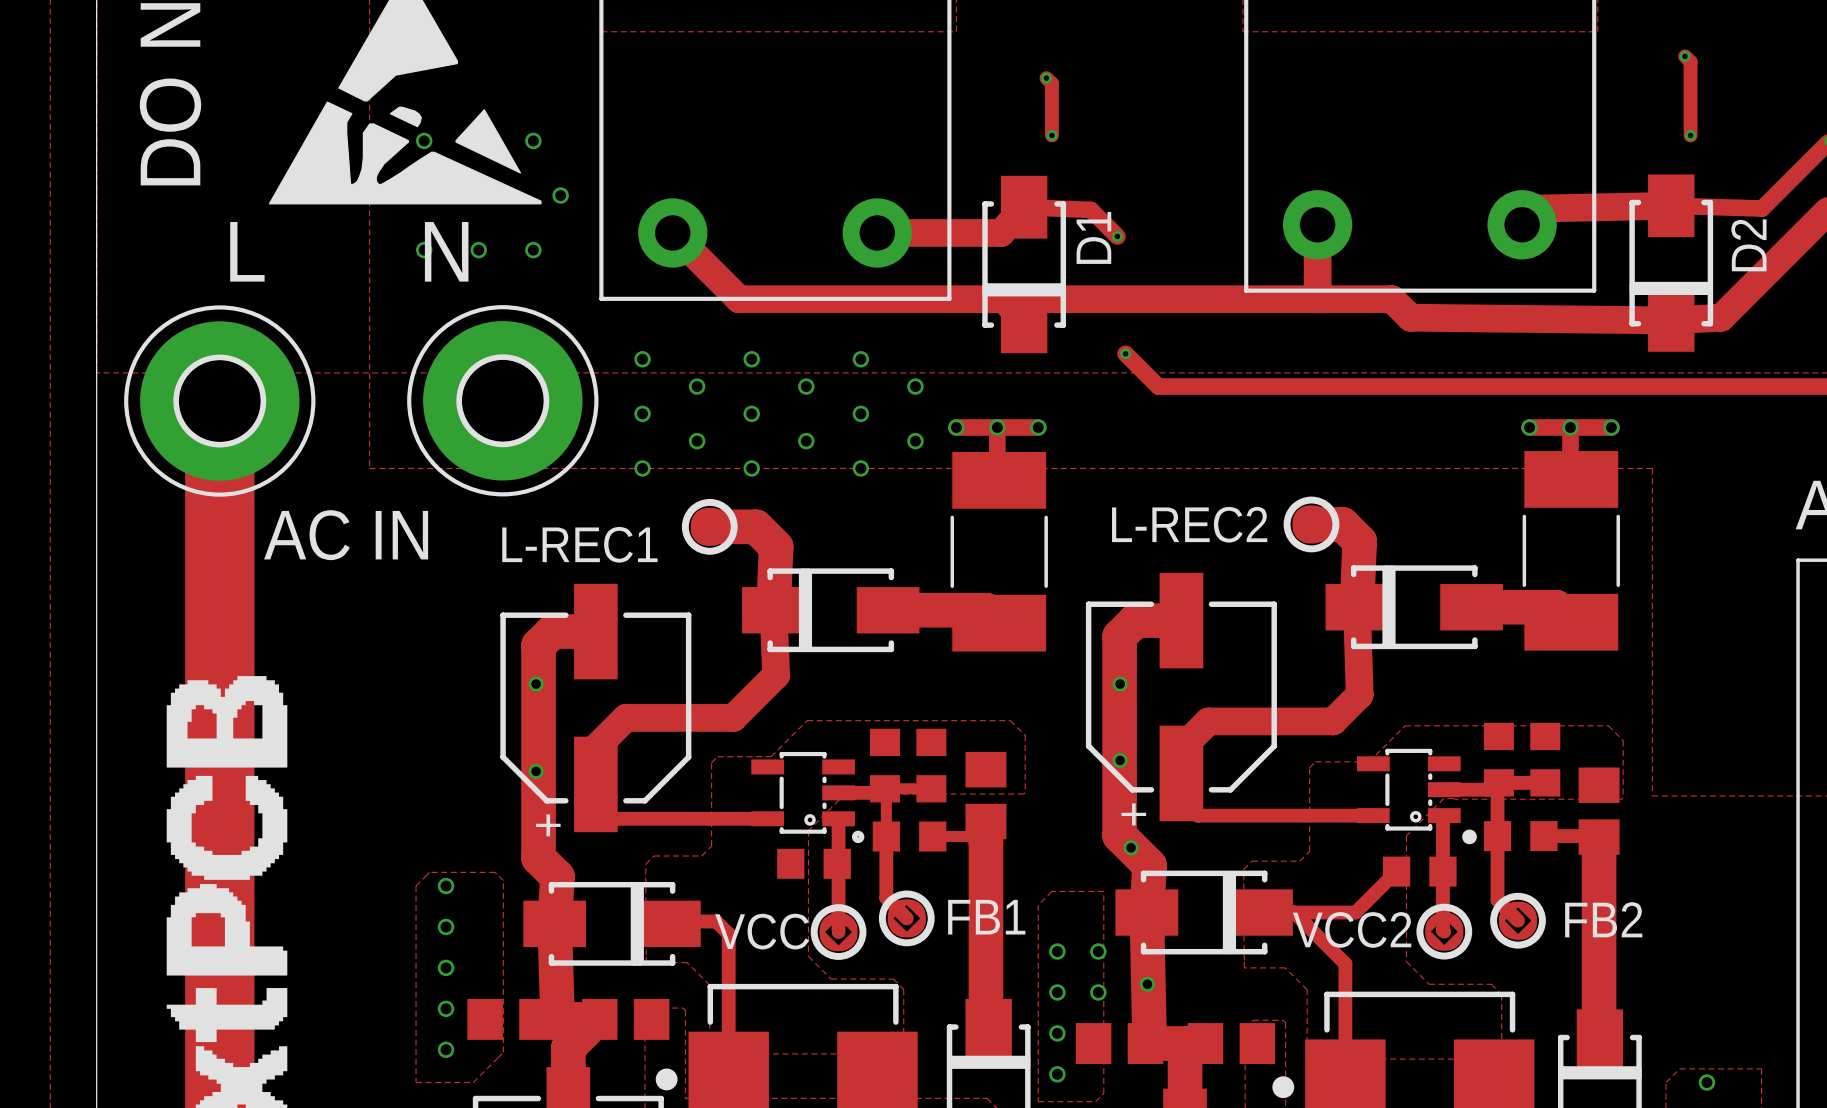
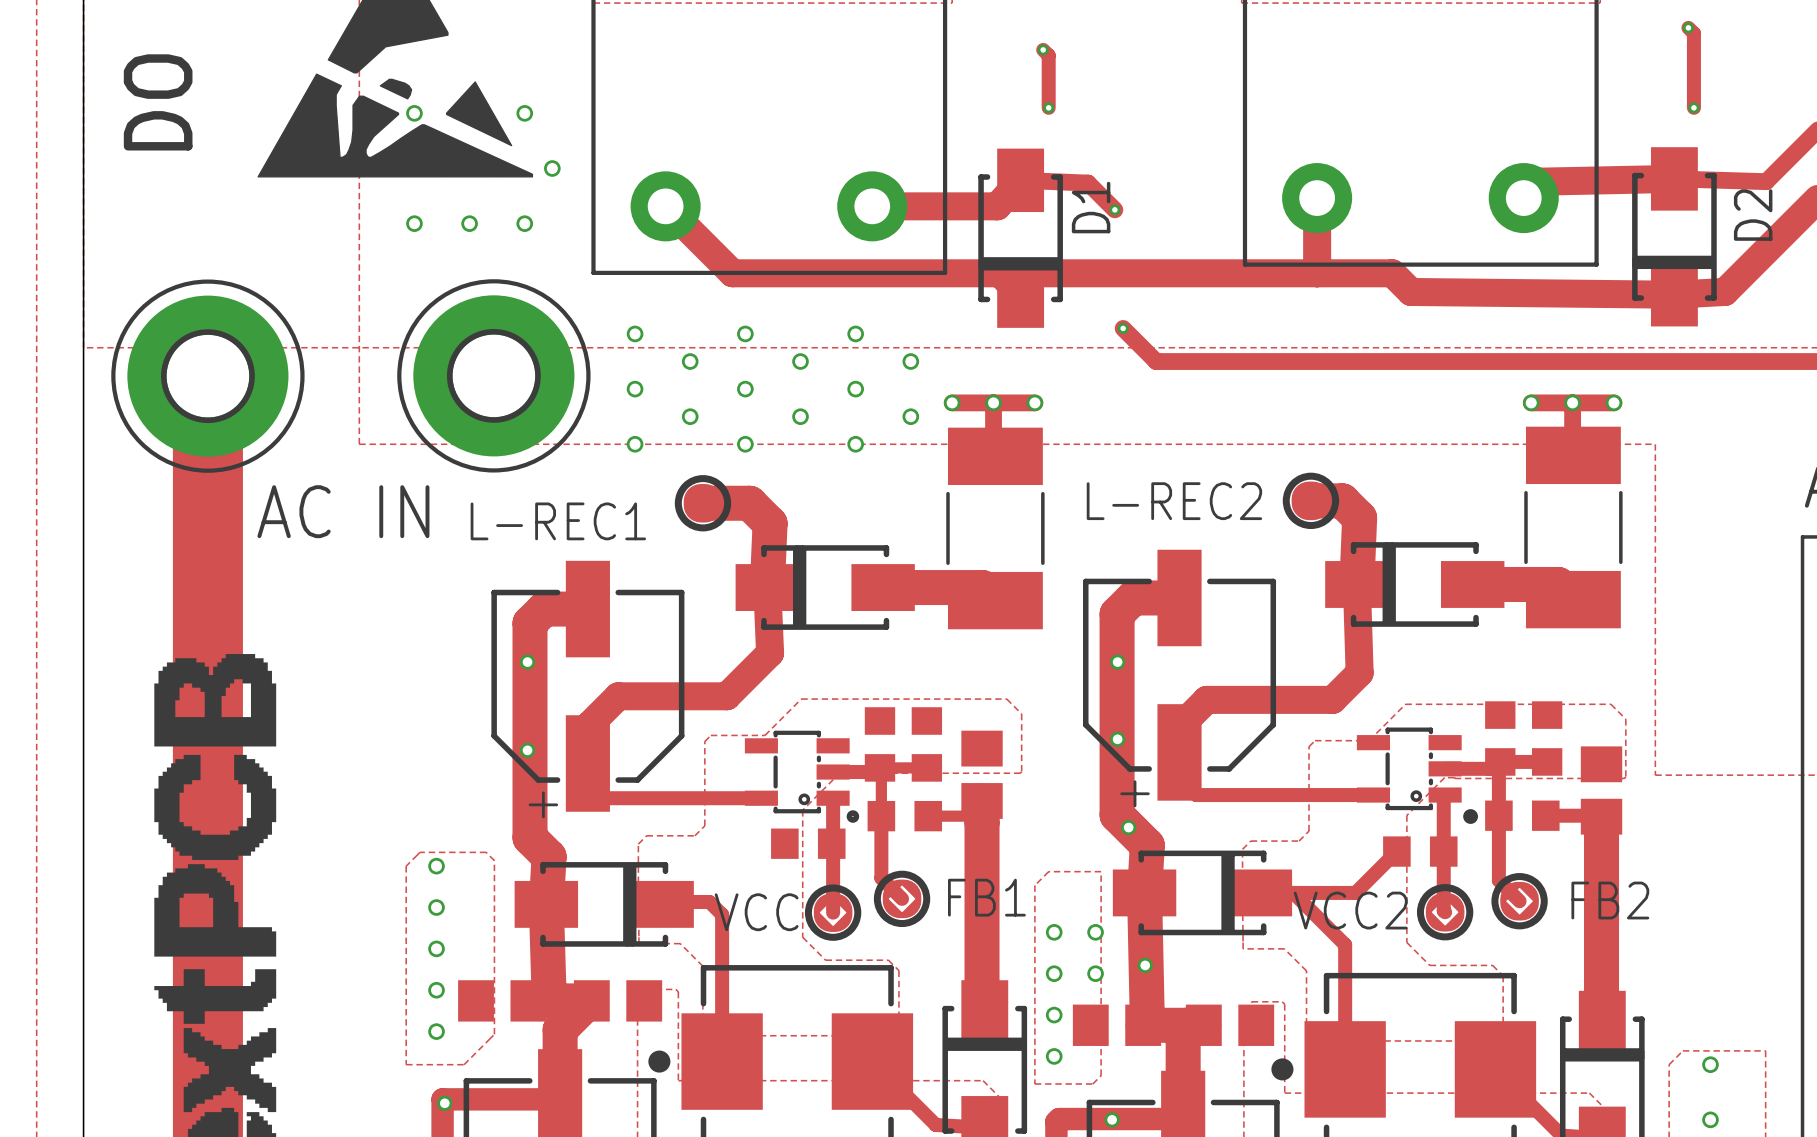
text: L (247, 251) -> none
text: N (446, 251) -> none

